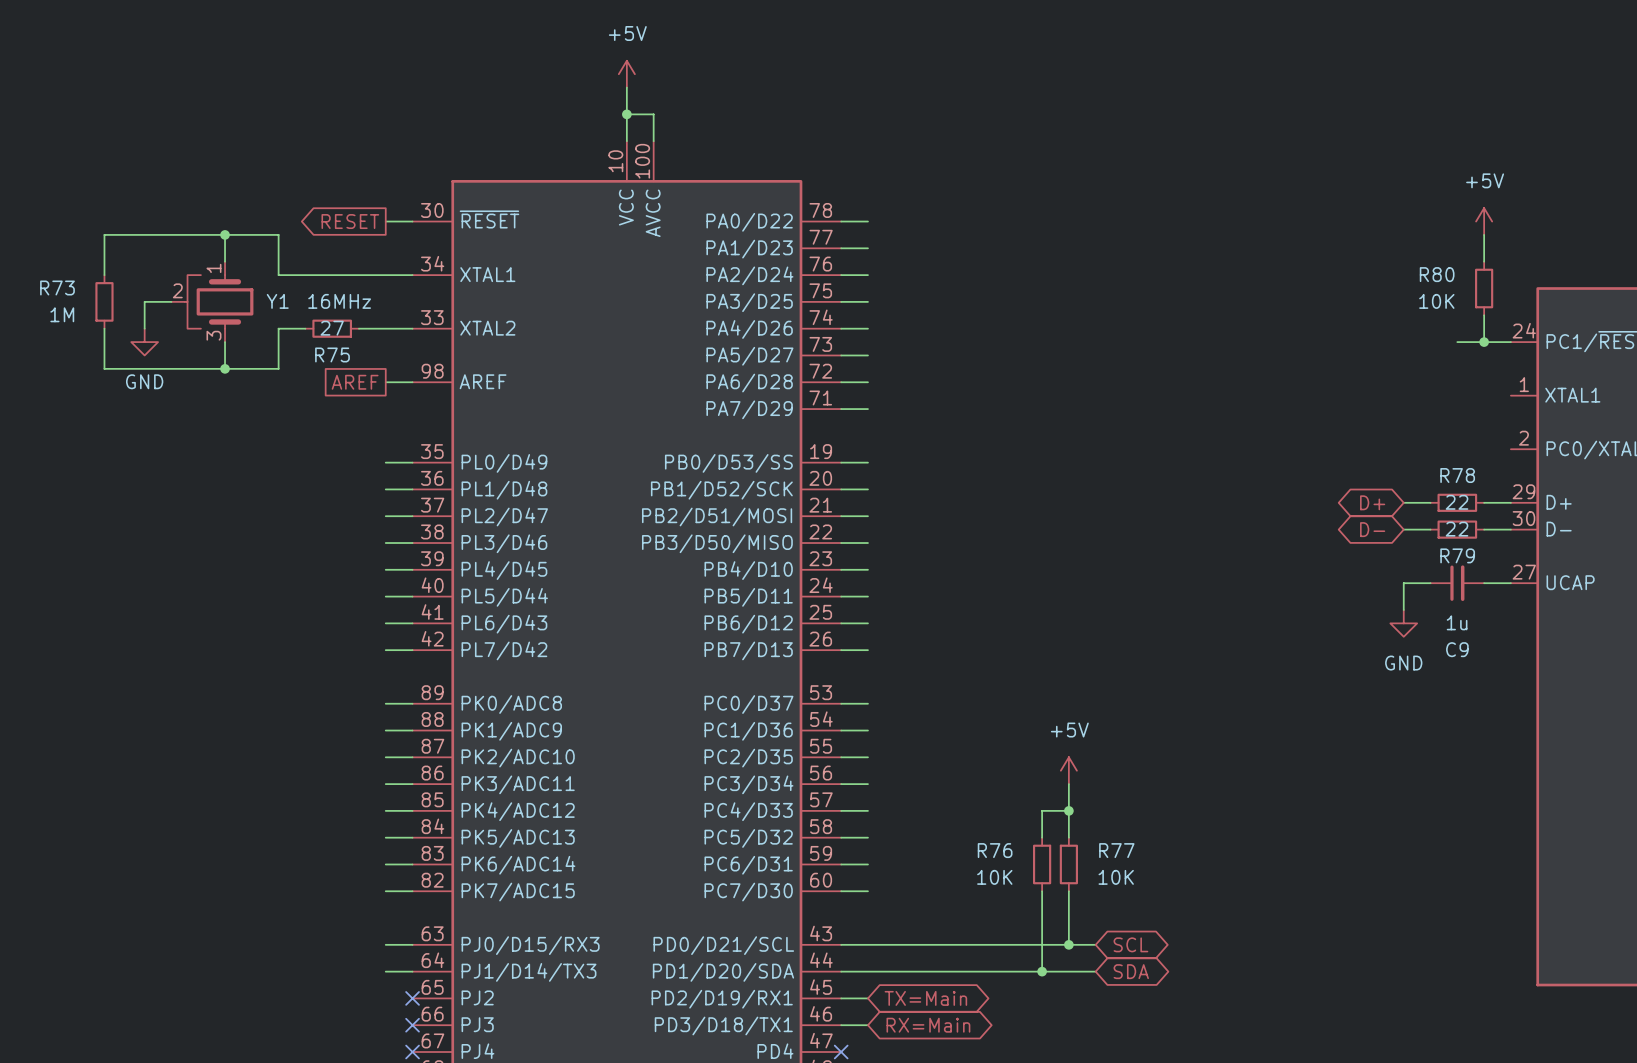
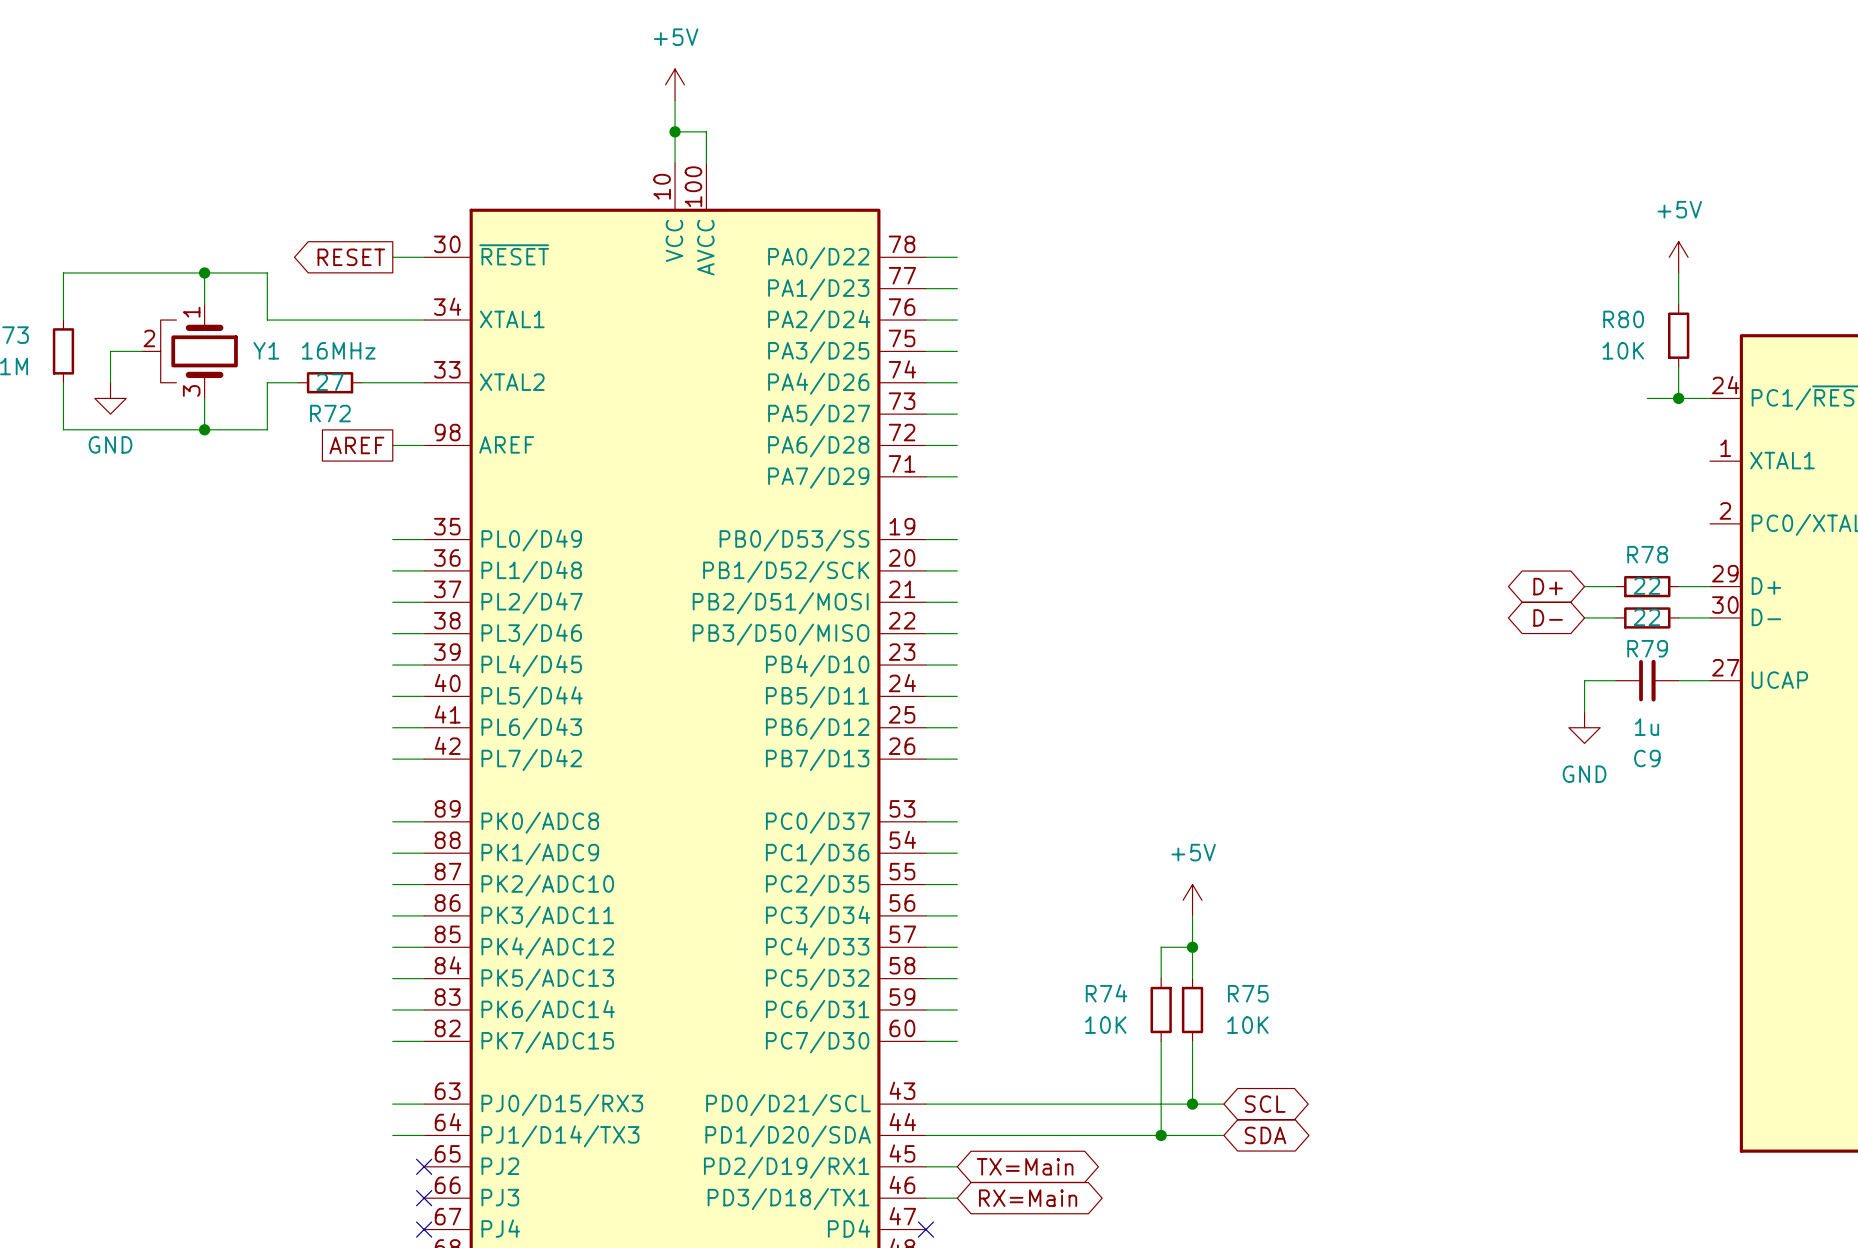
R75 name: R75 (332, 354) -> R72 (330, 413)
R76 name: R76 (995, 850) -> R74 (1106, 993)
R77 name: R77 (1116, 850) -> R75 (1248, 993)

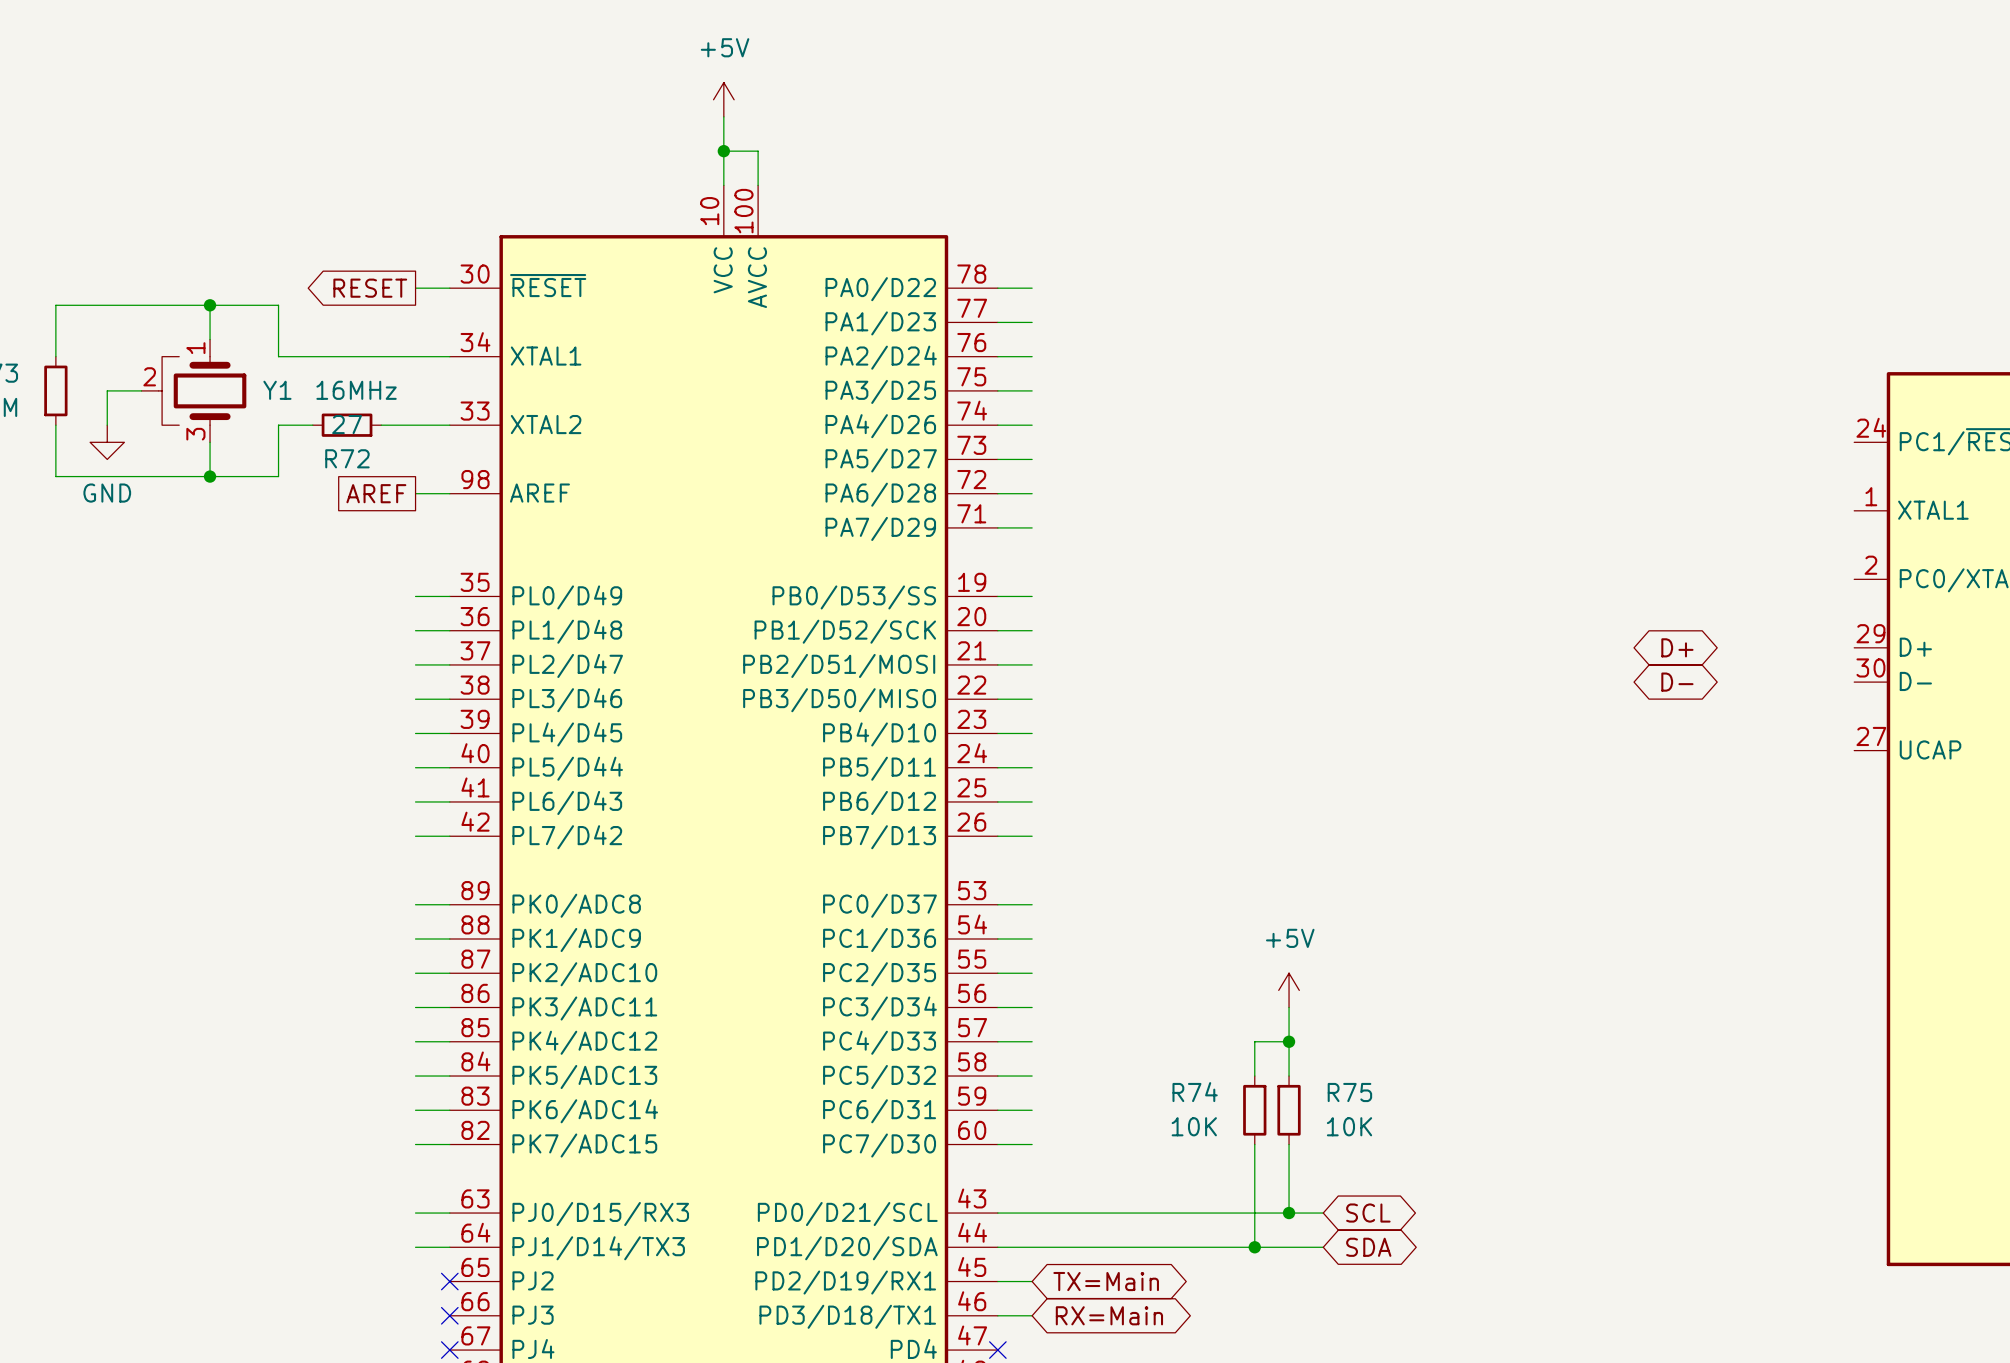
power symbol: +5V (1678, 257) -> none
wire: (1678, 272) (1678, 304) -> none
R80: 10K (1678, 335) -> none
wire: (1678, 367) (1678, 398) -> none
wire: (1647, 398) (1710, 398) -> none
junction: (1678, 398) -> none
wire: (1584, 586) (1615, 586) -> none
R78: 22 (1647, 586) -> none
wire: (1678, 586) (1710, 586) -> none
wire: (1584, 617) (1615, 617) -> none
R79: 22 (1647, 617) -> none
wire: (1678, 617) (1710, 617) -> none
wire: (1615, 680) (1584, 680) (1584, 712) -> none
C9: 1u (1647, 680) -> none
wire: (1678, 680) (1710, 680) -> none
power symbol: GND (1584, 727) -> none

